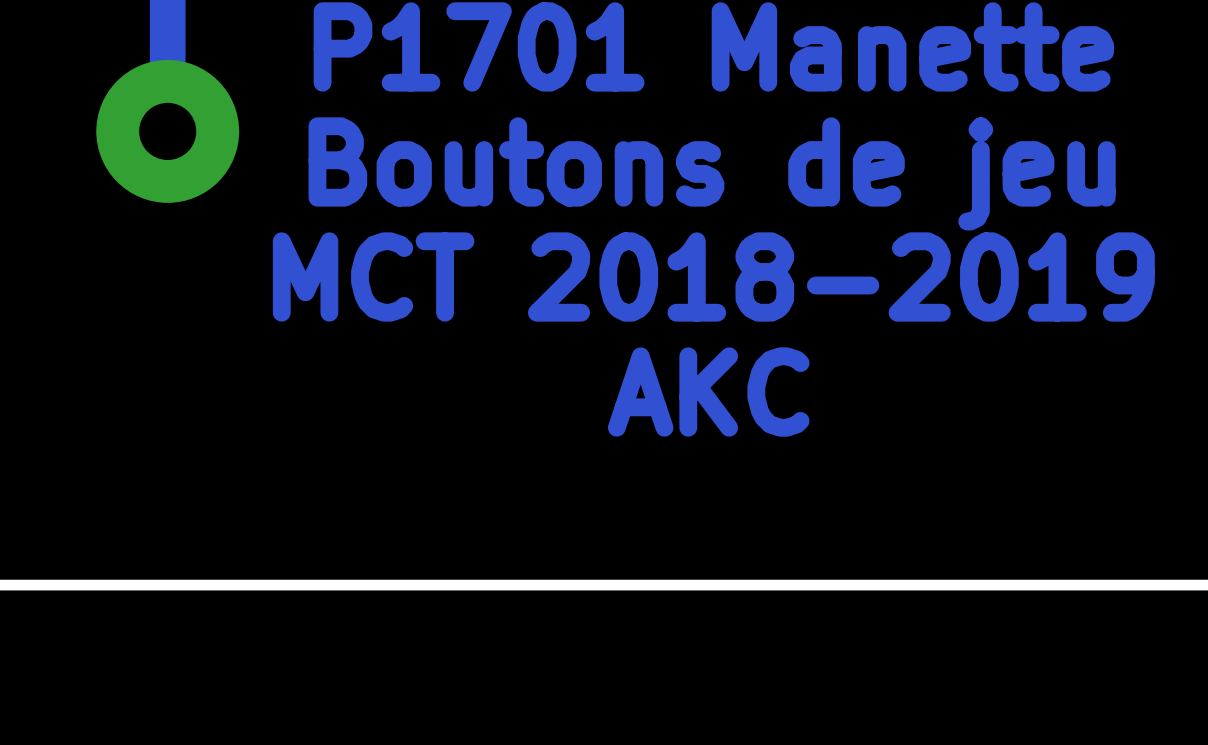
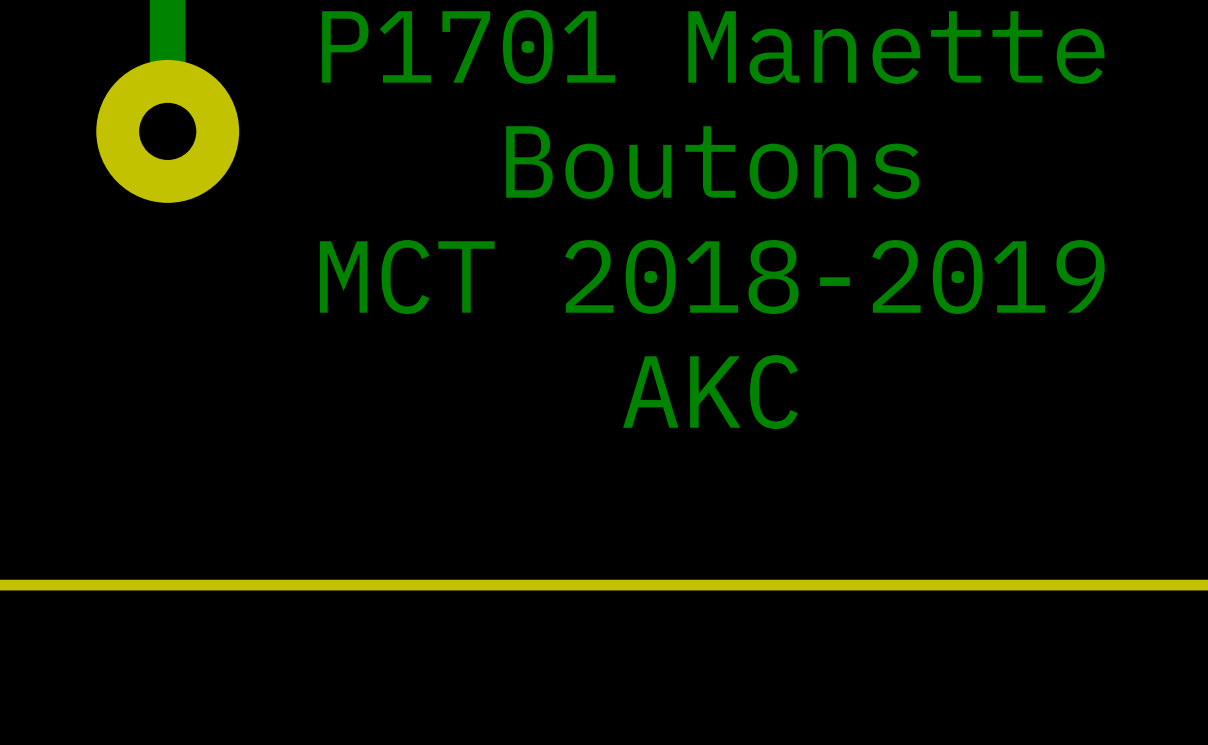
text: Boutons de jeu (712, 173) -> Boutons (712, 162)

